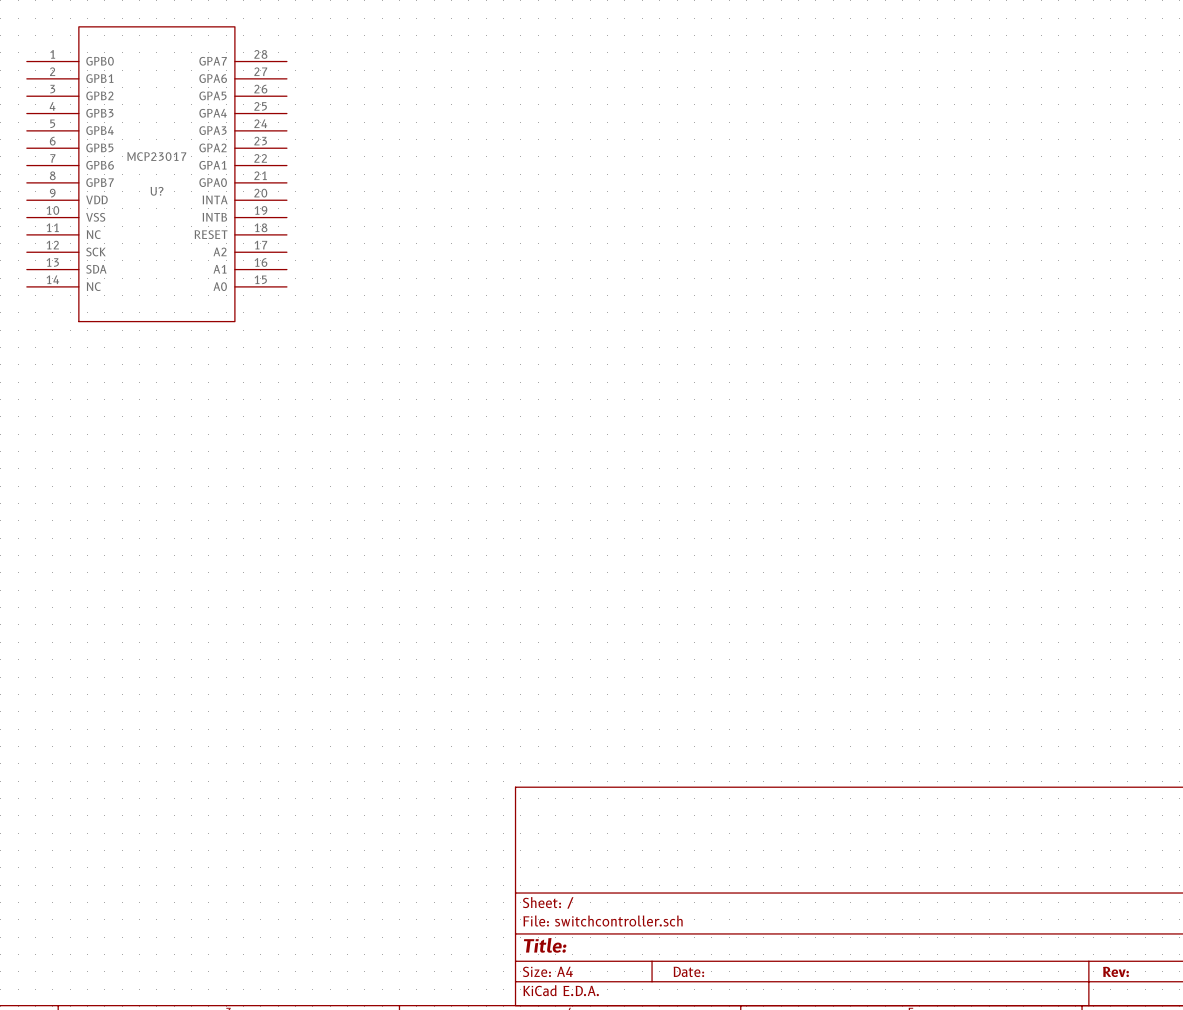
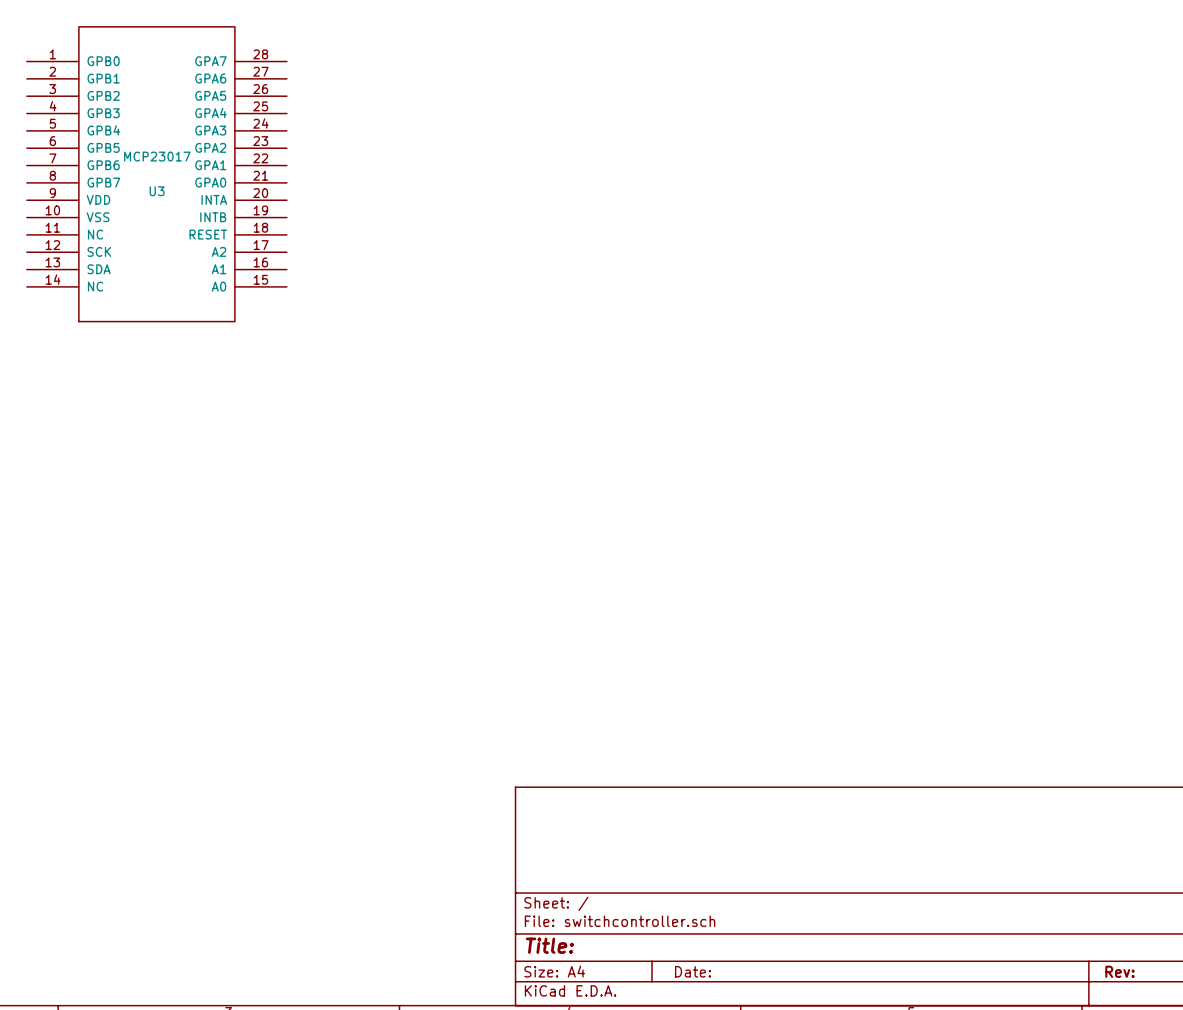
U? name: U? (157, 191) -> U3 (157, 191)

